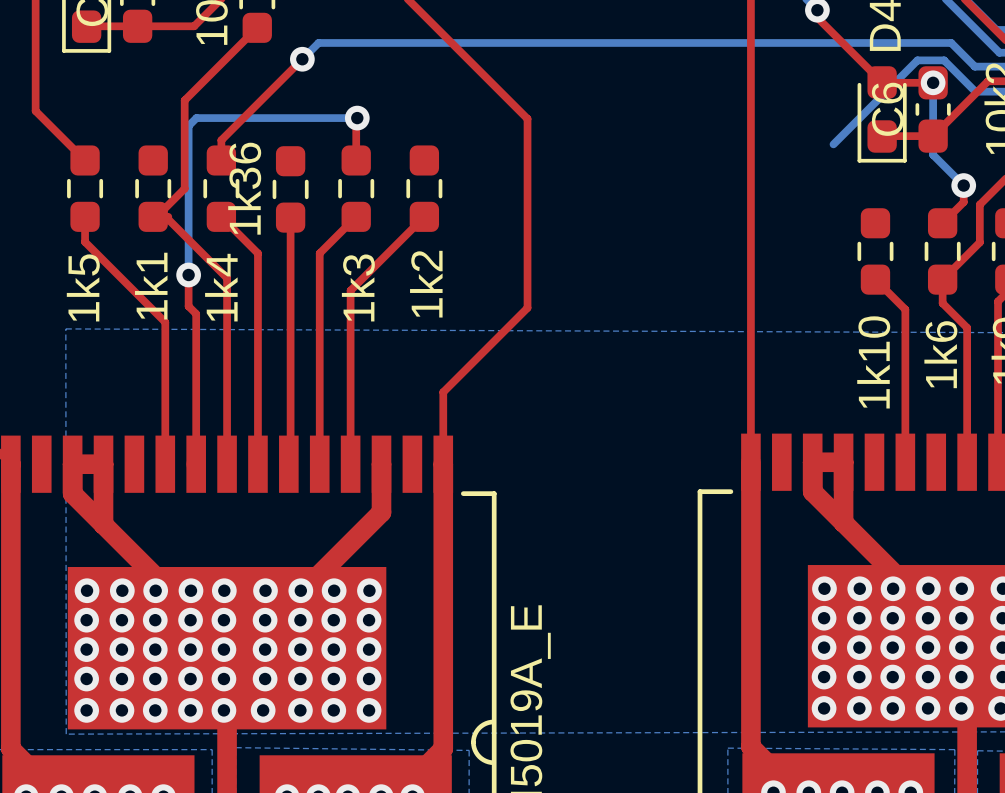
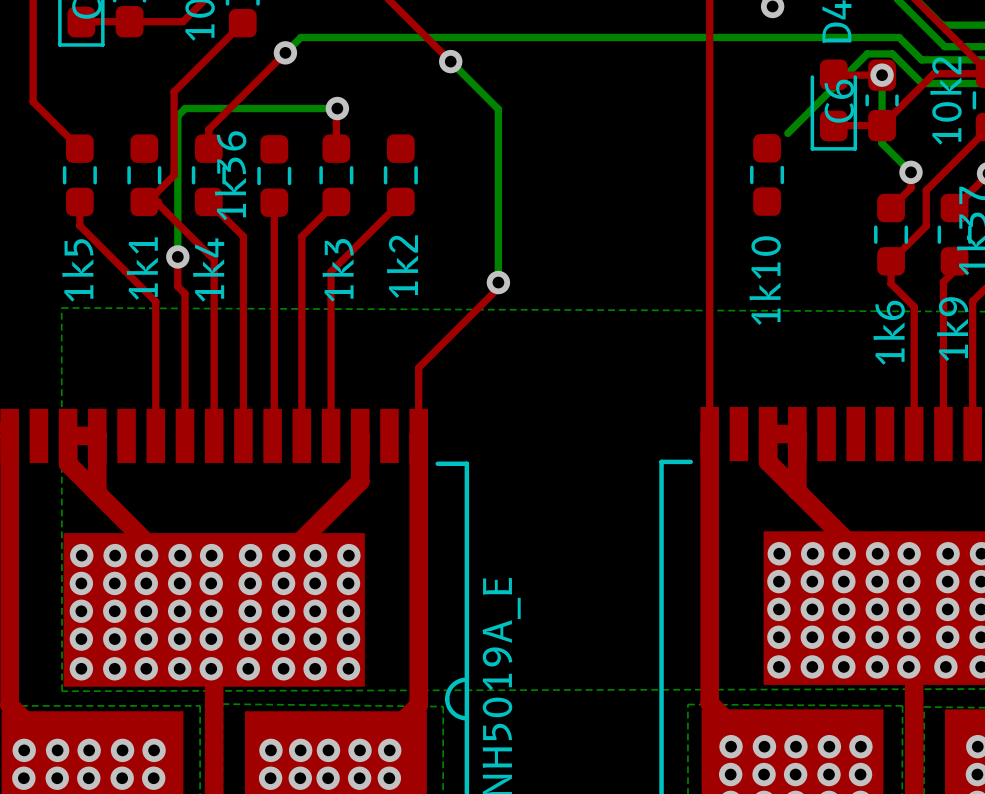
top track: (817, 10) (817, 17) (882, 82) -> none
top track: (477, 68) (527, 118) (527, 302) -> none
bottom track: none -> (450, 61) (498, 109) (498, 282)
via: none -> (450, 61)
1k10 position: (875, 251) -> (767, 174)
top track: (875, 279) (905, 309) (905, 462) -> none
via: none -> (498, 282)

